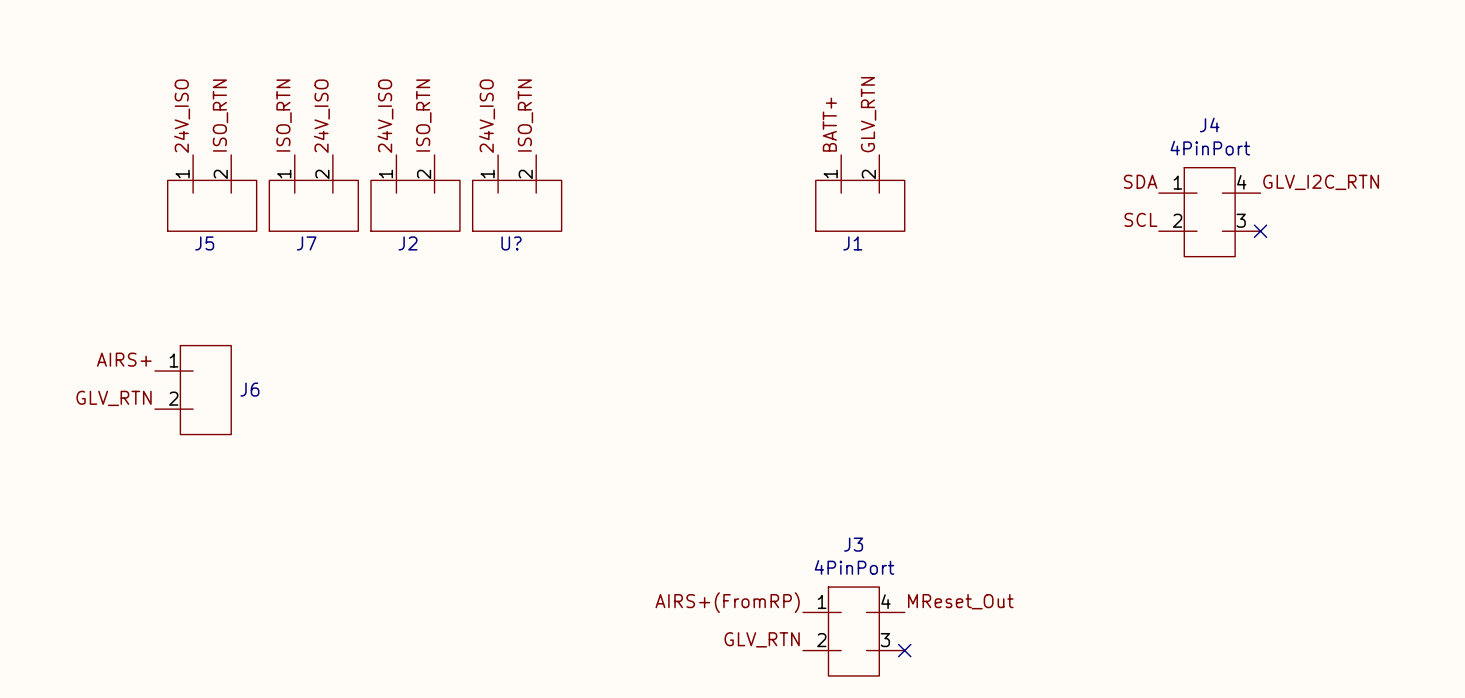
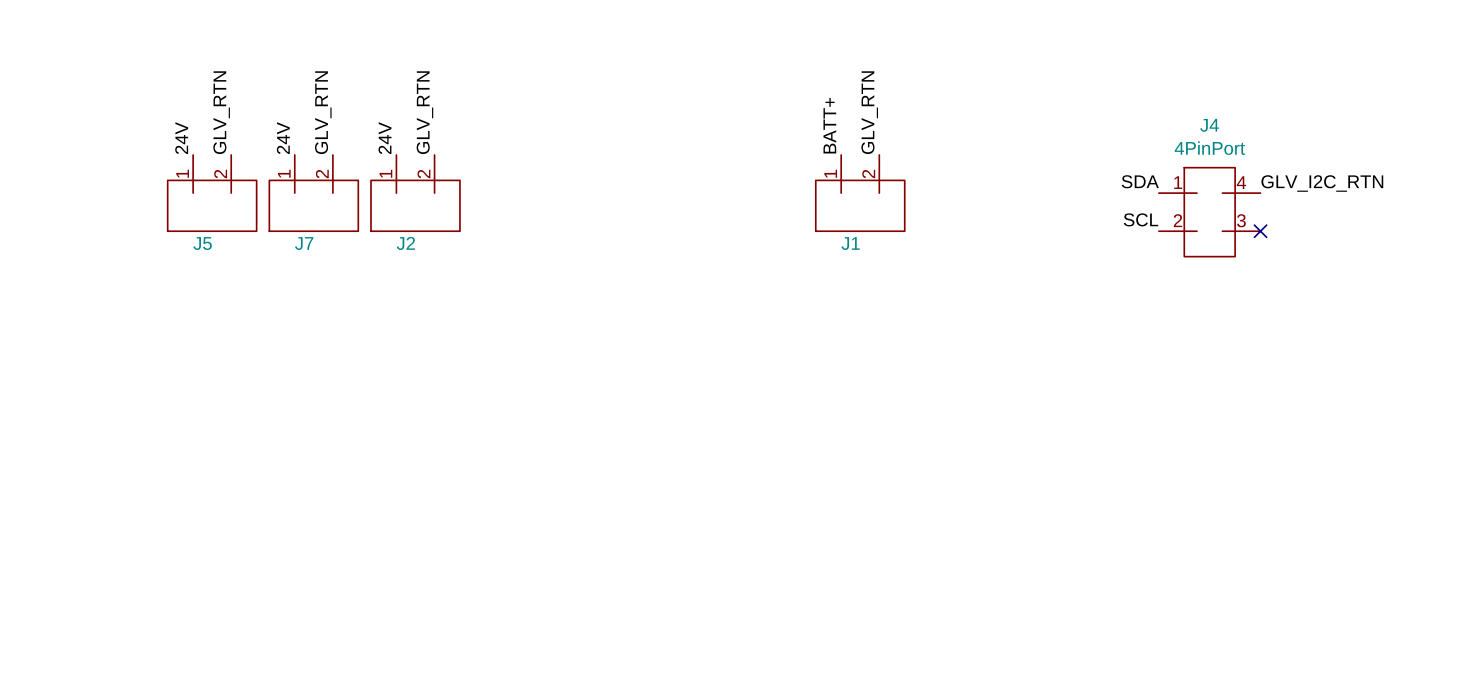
label: ISO_RTN (220, 115) -> GLV_RTN (221, 112)
label: ISO_RTN (284, 115) -> 24V (283, 138)
label: ISO_RTN (423, 115) -> GLV_RTN (424, 112)
label: ISO_RTN (525, 115) -> none
label: 24V_ISO (182, 116) -> 24V (181, 138)
label: 24V_ISO (321, 116) -> GLV_RTN (323, 112)
label: 24V_ISO (385, 116) -> 24V (384, 138)
label: 24V_ISO (487, 116) -> none
U?: (517, 193) -> none
label: AIRS+ (124, 359) -> none
J6: (193, 390) -> none
label: GLV_RTN (114, 398) -> none
label: MReset_Out (960, 601) -> none
label: AIRS+(FromRP) (727, 602) -> none
J3: 4PinPort (853, 631) -> none
label: GLV_RTN (762, 639) -> none
no-connect mark: (904, 650) -> none

